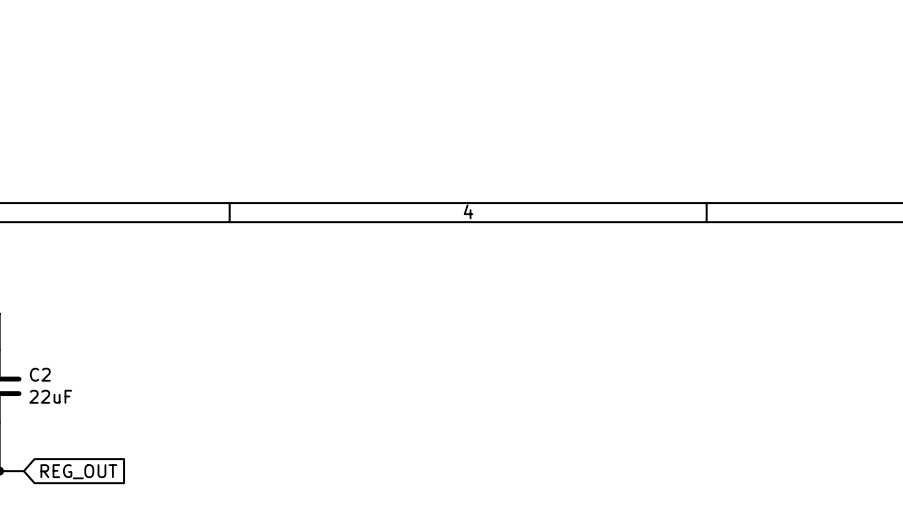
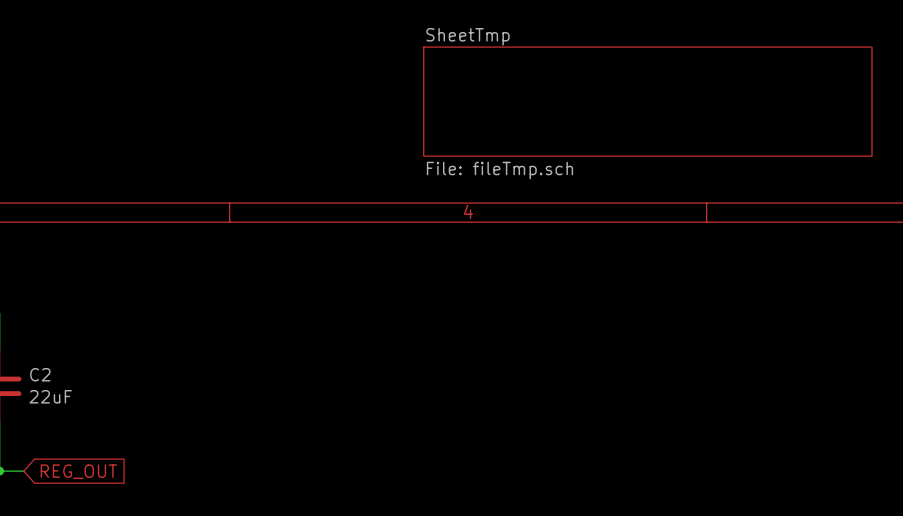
sheet SheetTmp: none -> File: fileTmp.sch (647, 101)

